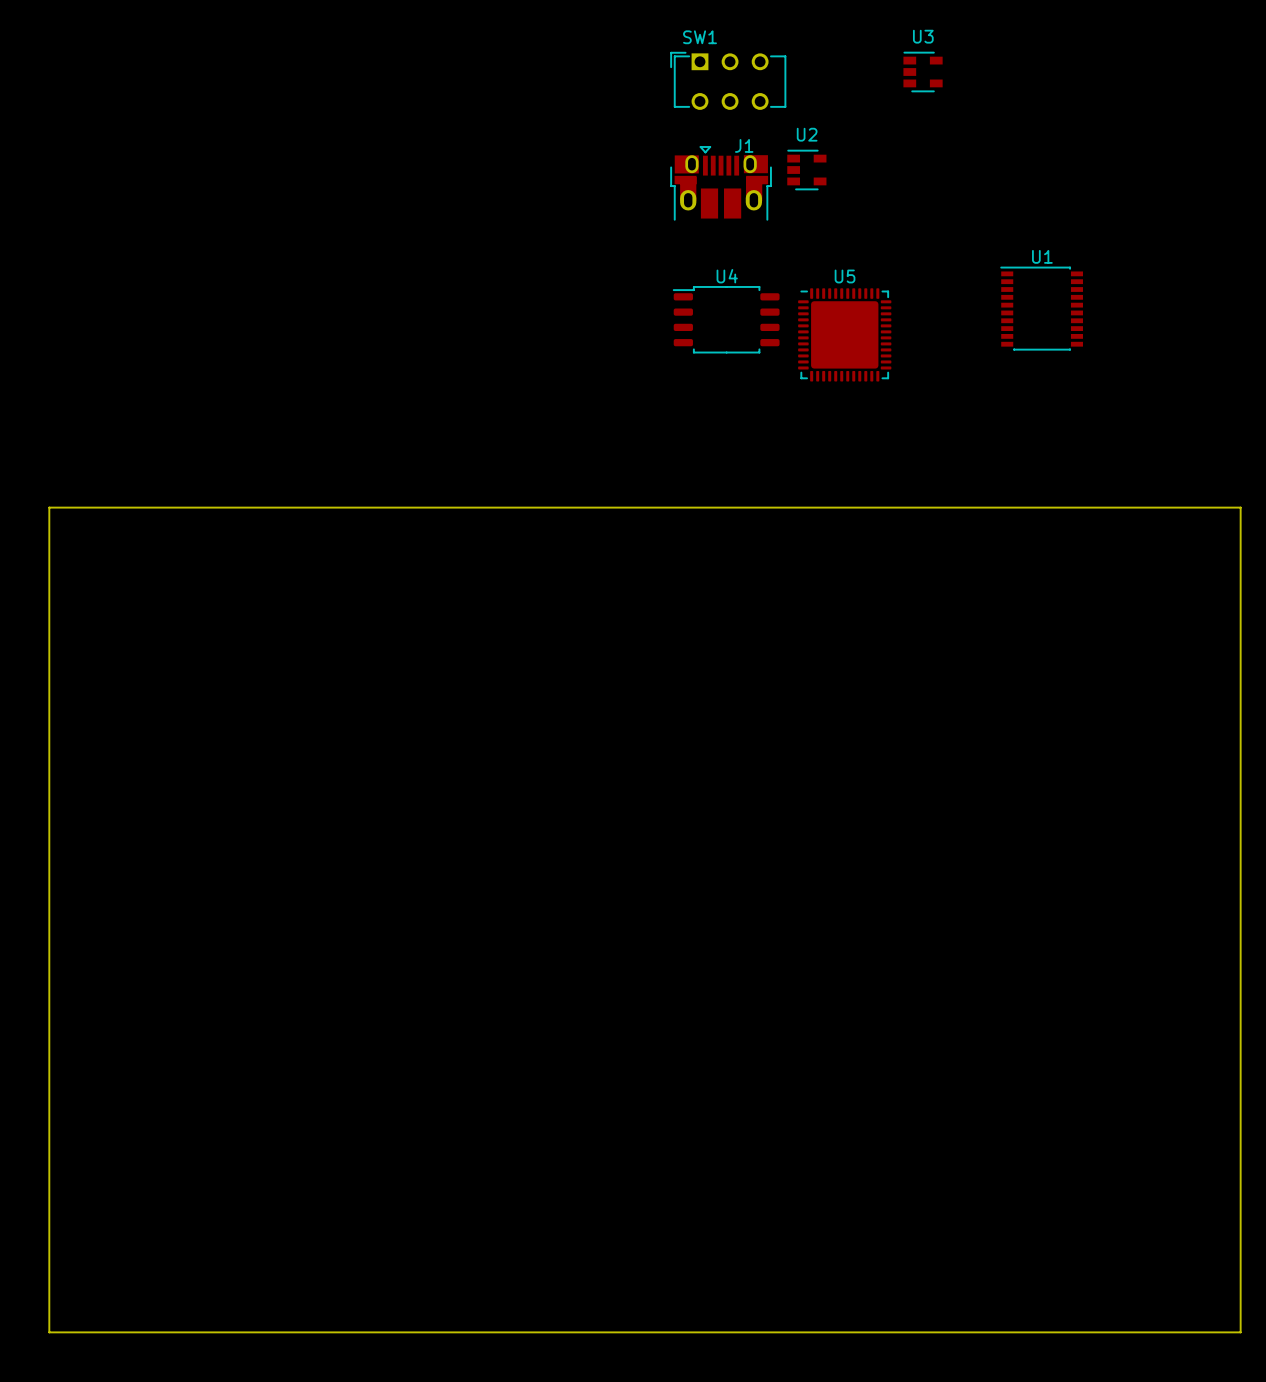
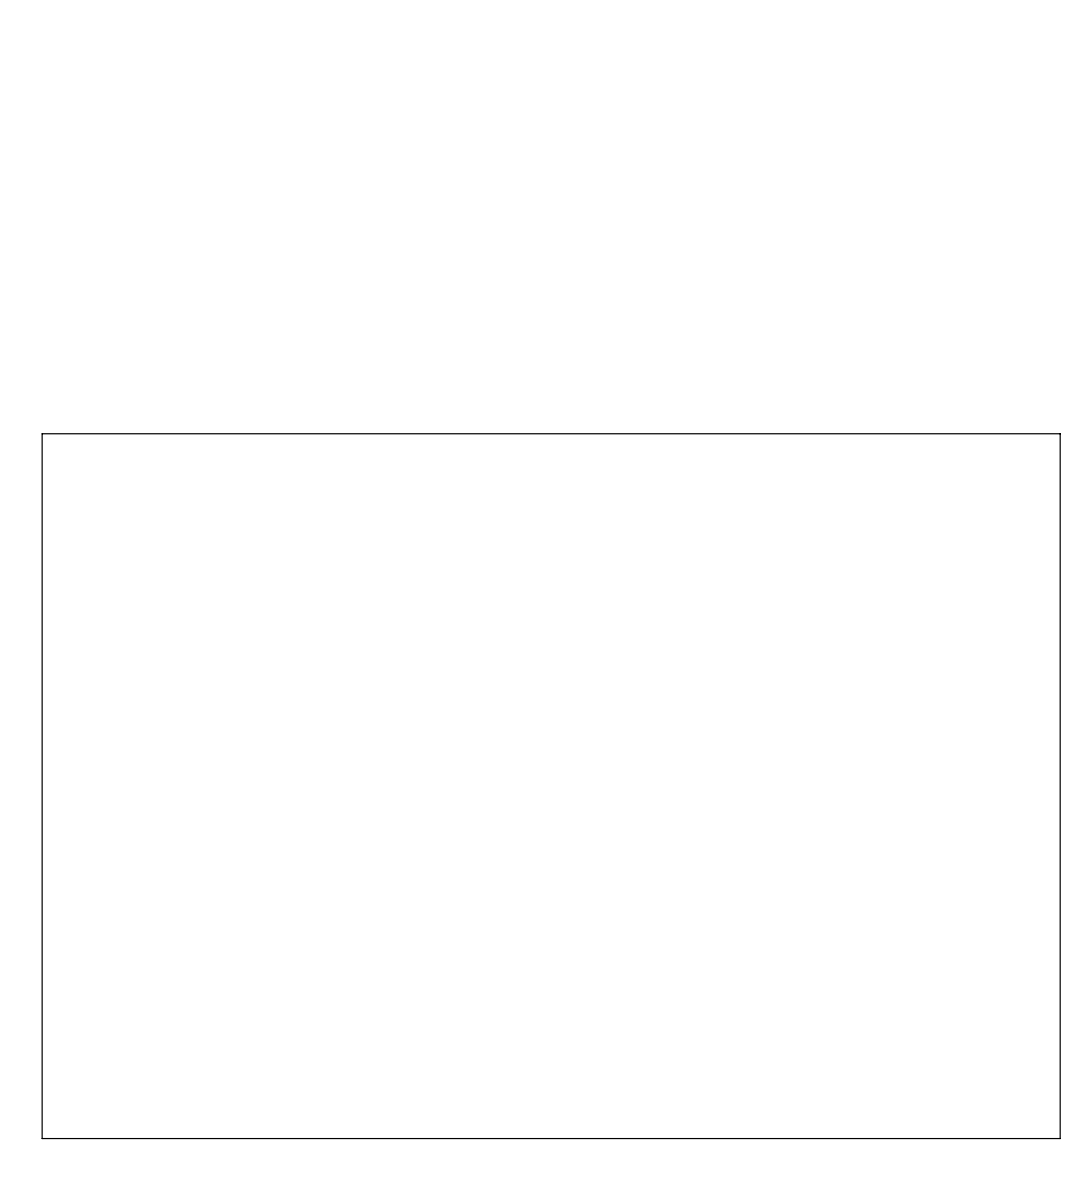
U3: (923, 72) -> none
SW1: (728, 80) -> none
U2: (806, 170) -> none
J1: (721, 183) -> none
U1: (1041, 308) -> none
U4: (726, 319) -> none
U5: (844, 334) -> none

